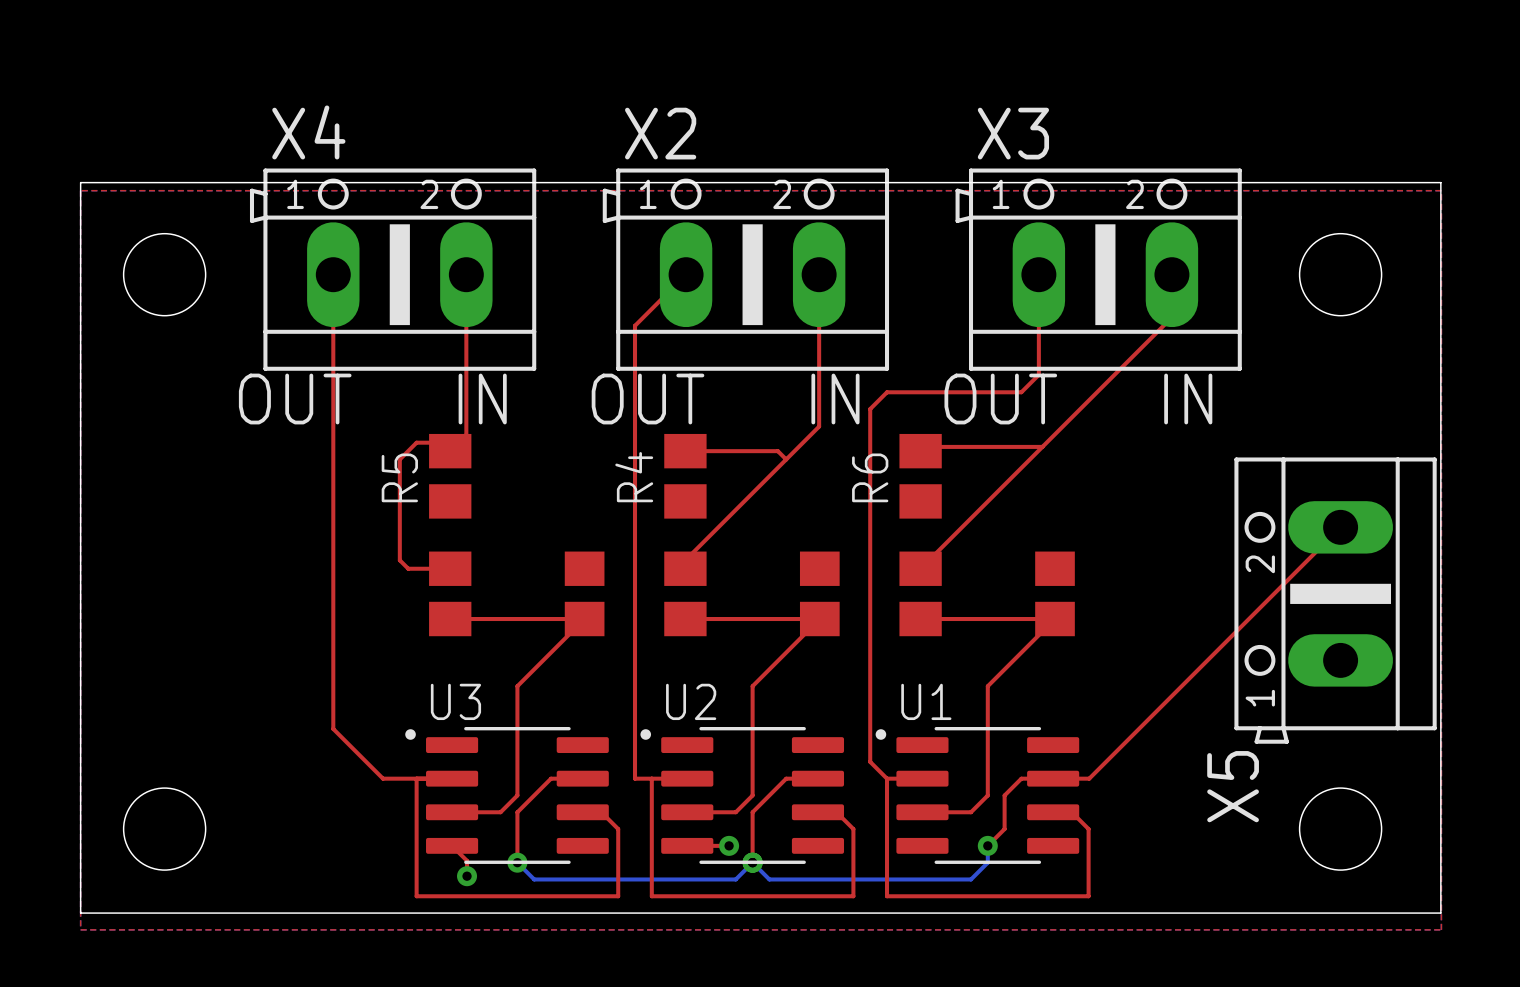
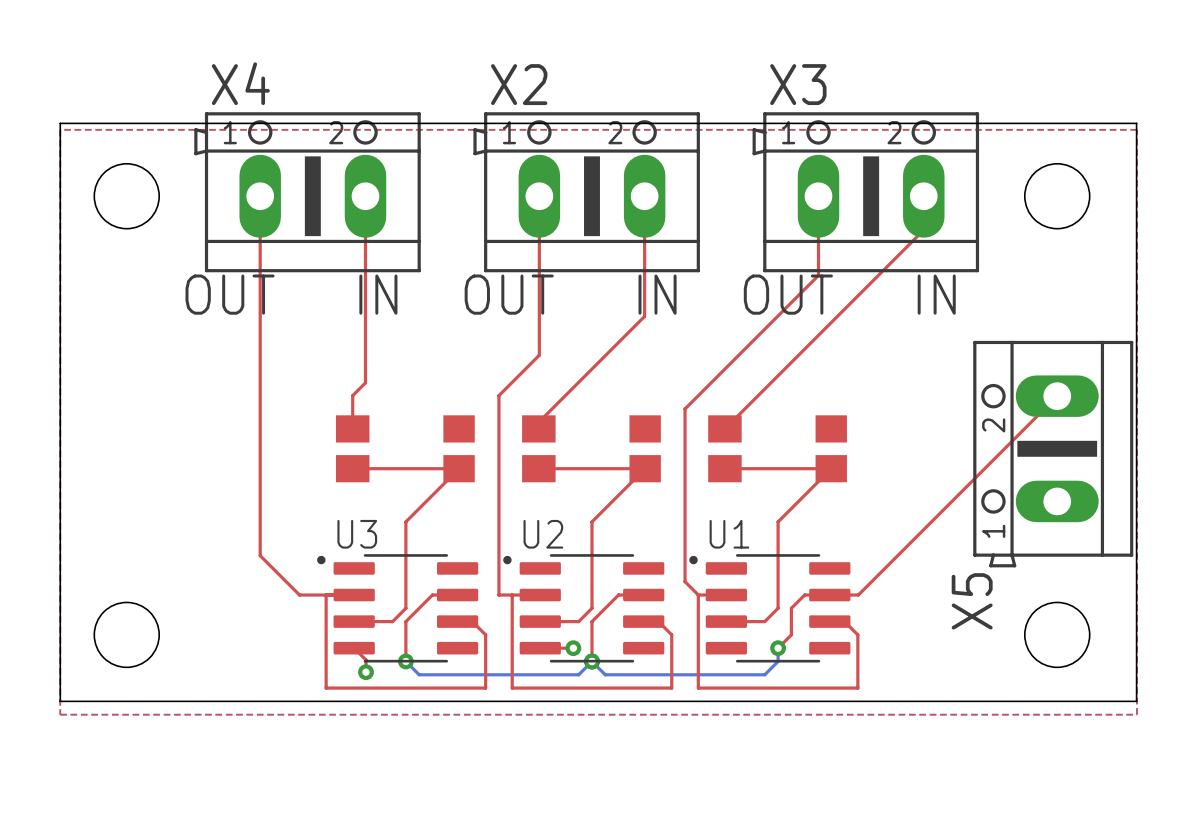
top track: (686, 274) (635, 325) (635, 526) -> (539, 196) (539, 355) (498, 395)
top track: (1021, 392) (887, 392) (870, 409) (870, 543) -> (804, 289) (685, 408)
top track: (454, 446) (450, 442) (416, 442) (399, 459) (399, 560) (408, 568) (450, 568) -> (365, 323) (365, 382) (352, 395) (352, 428)
top track: (1042, 446) (924, 446) (920, 451) -> none
top track: (685, 451) (777, 451) (786, 459) -> none
R5: (450, 476) -> none
R4: (685, 476) -> none
R6: (920, 476) -> none

